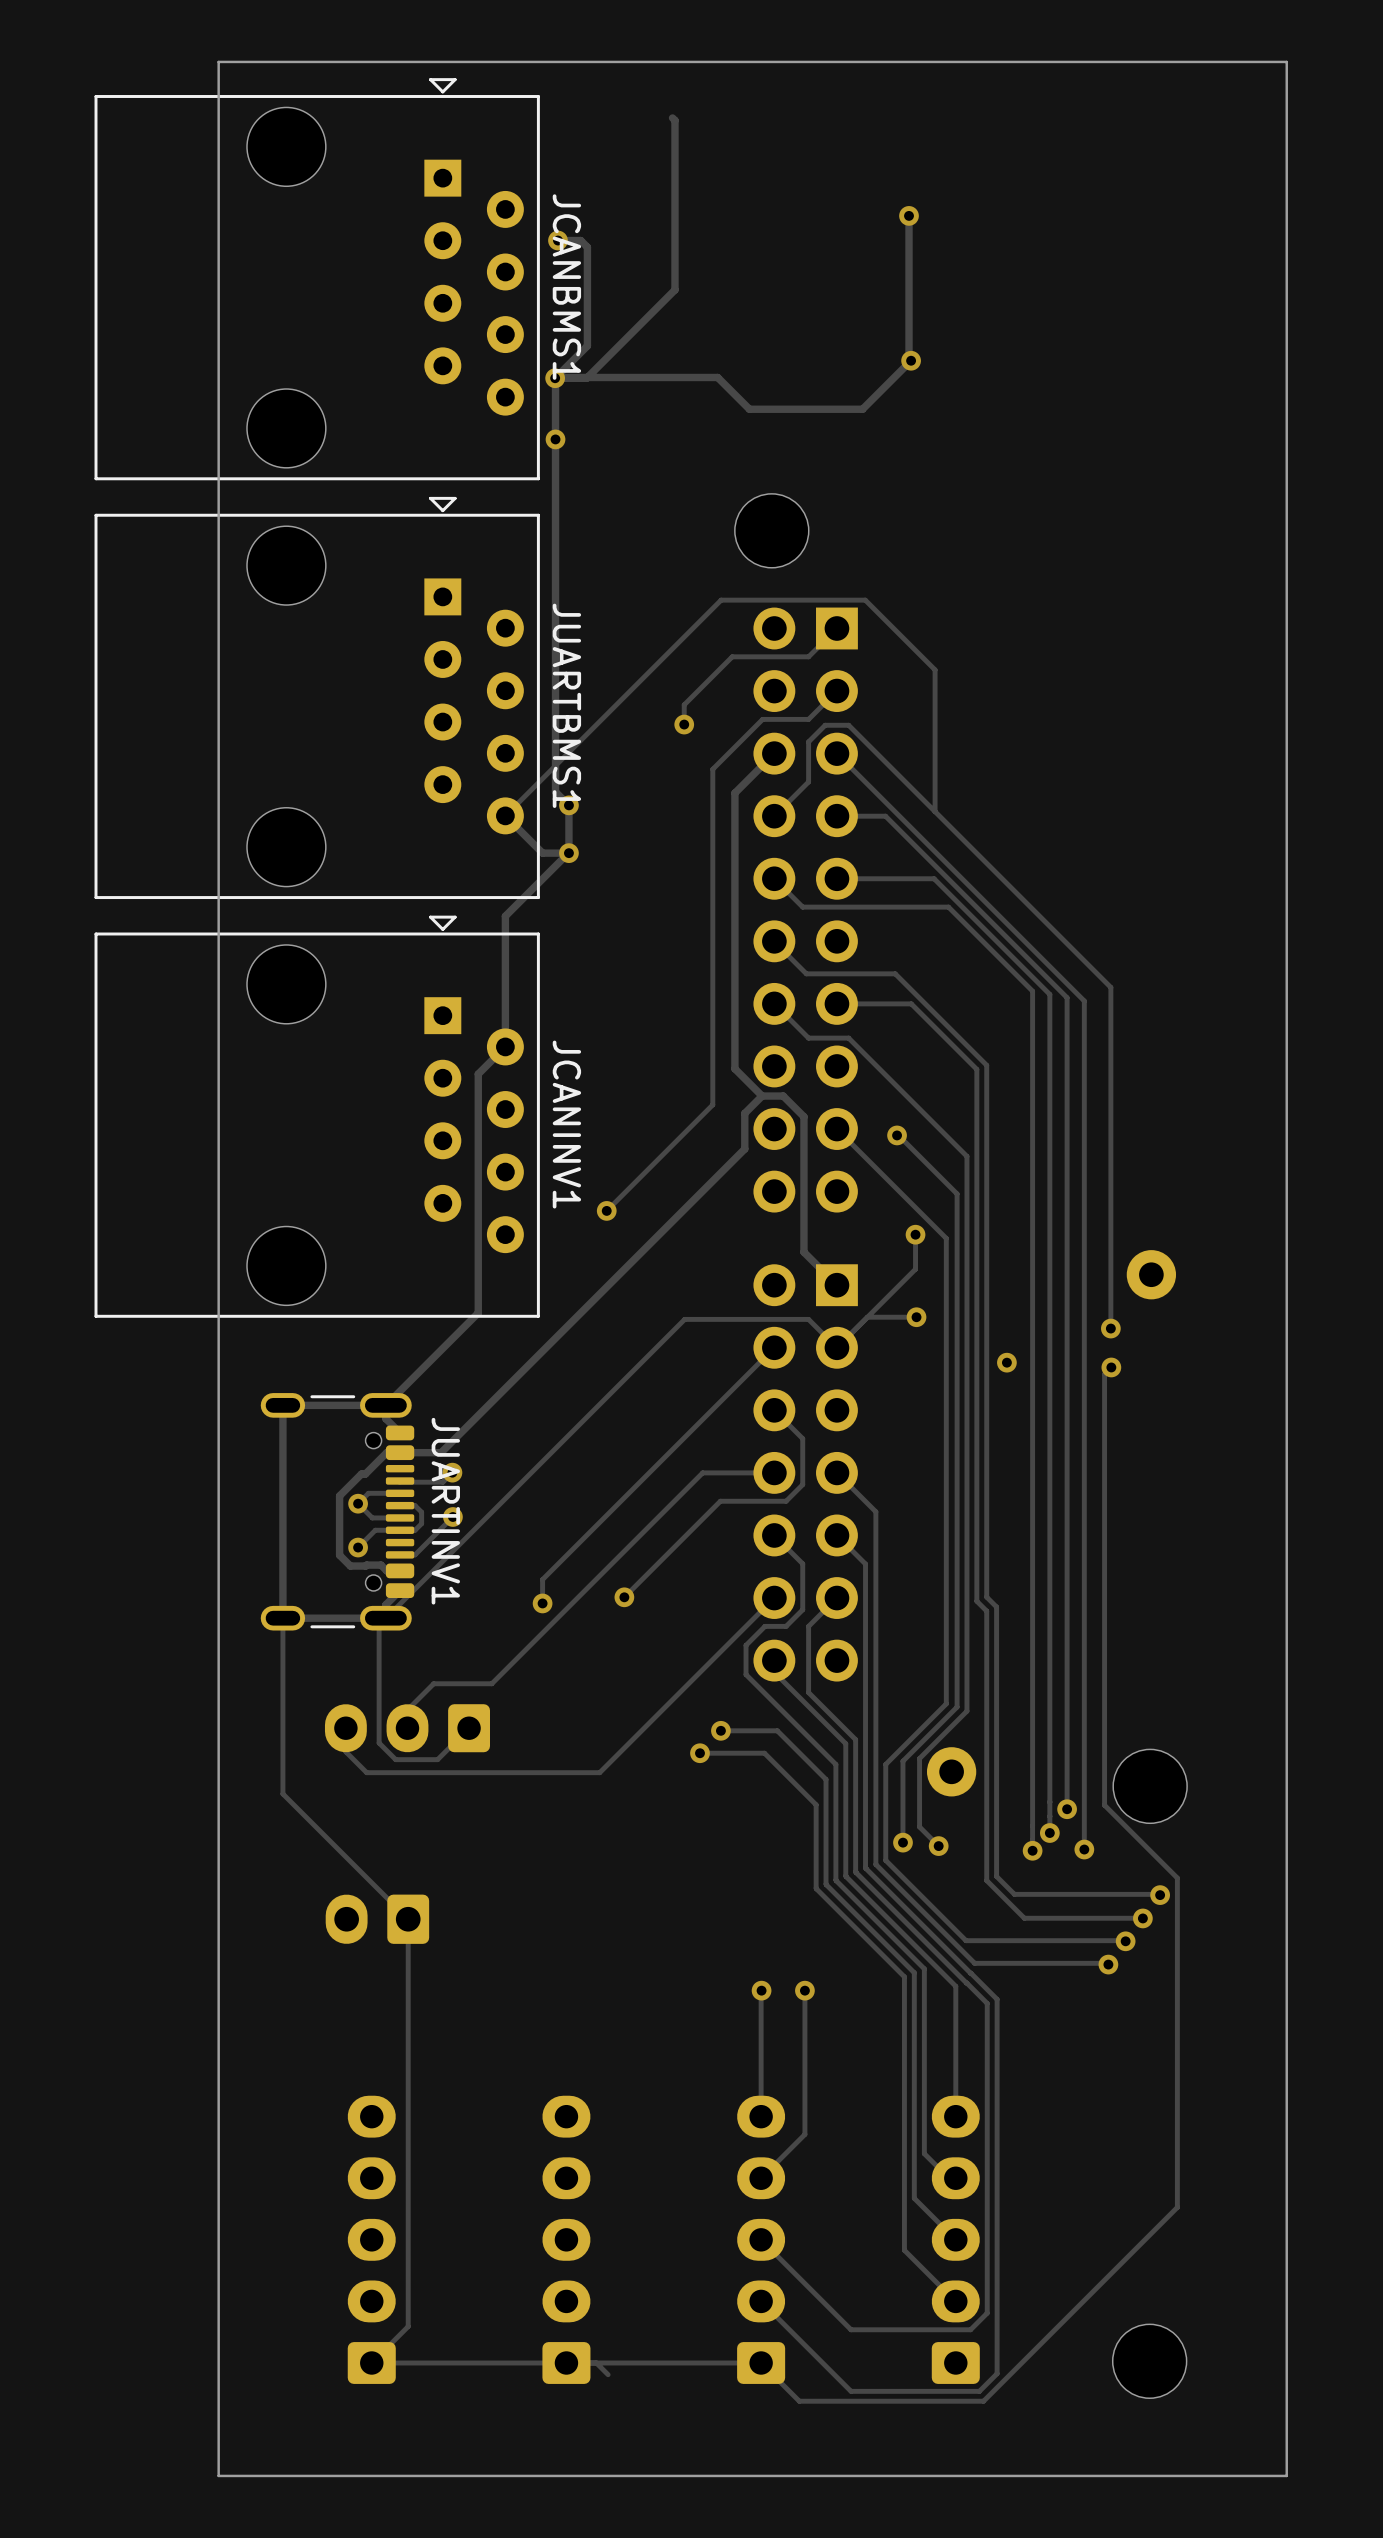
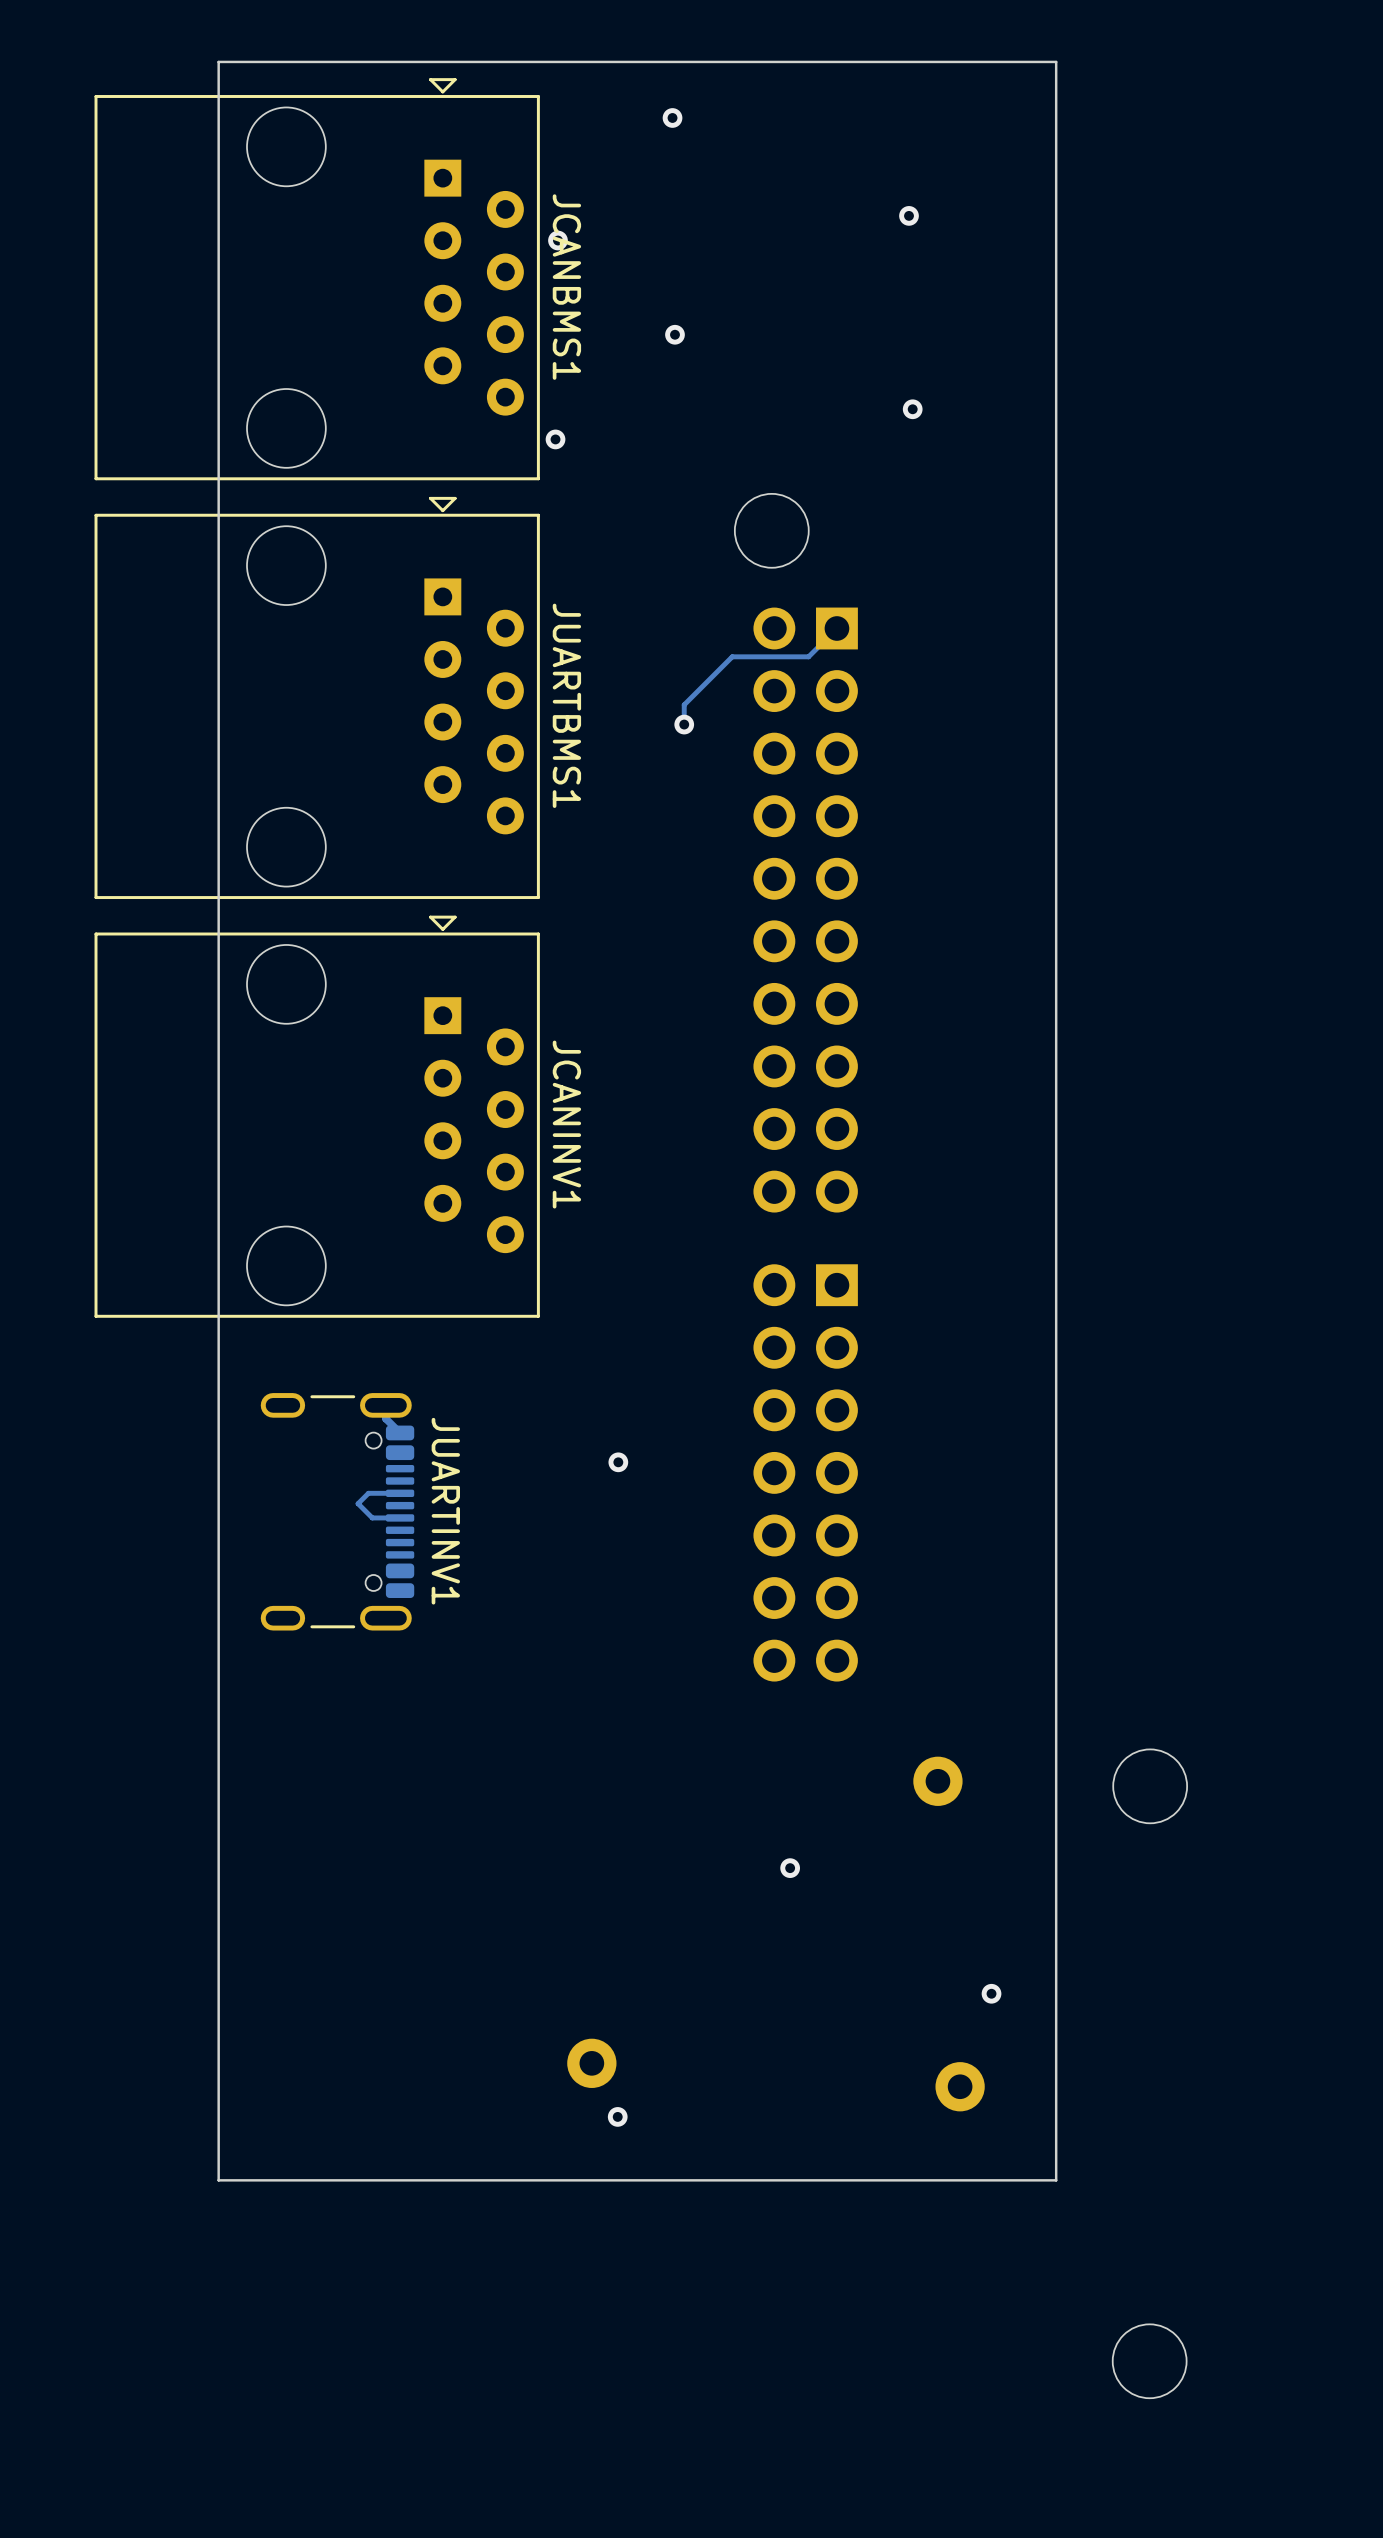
board edge: (1056, 61) (1286, 61) (1286, 2475) (218, 2475) (218, 2180) -> (1056, 61) (1056, 2180) (218, 2180)
track: (672, 117) (674, 120) (674, 289) (586, 378) (555, 378) -> none
via: none -> (672, 117)
track: (909, 215) (909, 358) (911, 360) (862, 409) (749, 409) (717, 377) (555, 377) -> none
track: (557, 240) (580, 240) (587, 247) (587, 345) (555, 378) -> none
via: none -> (674, 334)
via position: (911, 360) -> (912, 409)
track: (555, 378) (555, 378) (555, 791) (568, 805) (568, 853) (542, 853) (505, 815) (721, 600) (865, 600) (935, 669) (935, 811) -> none
via: (555, 378) -> none
track: (836, 691) (808, 719) (762, 719) (712, 769) (712, 1104) (606, 1210) -> none
track: (774, 753) (734, 793) (734, 1068) (762, 1096) -> none
track: (836, 753) (1084, 1001) (1084, 1849) -> none
via: (568, 805) -> none
track: (774, 816) (808, 781) (808, 741) (825, 725) (848, 725) (1110, 987) (1110, 1328) -> none
track: (836, 816) (885, 816) (1067, 997) (1067, 1809) -> none
track: (568, 853) (505, 916) (505, 1046) (478, 1074) (478, 1313) (385, 1405) (282, 1405) (282, 1618) -> none
via: (568, 853) -> none
track: (774, 878) (802, 907) (948, 907) (1032, 991) (1032, 1850) -> none
track: (836, 878) (934, 878) (1049, 994) (1049, 1833) -> none
track: (774, 941) (806, 973) (895, 973) (986, 1065) (986, 1597) (996, 1607) (996, 1876) (1014, 1894) (1160, 1895) -> none
track: (774, 1003) (808, 1038) (848, 1038) (966, 1156) (966, 1711) (919, 1758) (919, 1826) (938, 1846) -> none
track: (836, 1003) (911, 1003) (976, 1069) (976, 1601) (986, 1611) (986, 1880) (1024, 1918) (1142, 1918) -> none
track: (762, 1096) (783, 1096) (803, 1116) (803, 1252) (836, 1285) -> none
track: (762, 1096) (744, 1113) (744, 1149) (441, 1452) (386, 1452) (339, 1495) (339, 1555) (350, 1566) (380, 1565) (386, 1570) (400, 1570) -> none
track: (836, 1129) (946, 1238) (946, 1703) (885, 1764) (885, 1860) (966, 1940) (1125, 1941) -> none
track: (897, 1135) (957, 1193) (957, 1707) (902, 1761) (902, 1843) -> none
via: (897, 1135) -> none
via: (606, 1210) -> none
track: (915, 1234) (915, 1269) (836, 1347) (808, 1319) (684, 1319) (379, 1624) (379, 1743) (395, 1759) (437, 1759) (469, 1728) -> none
via: (915, 1234) -> none
part: (1151, 1274) -> none
track: (916, 1317) (867, 1317) -> none
via: (916, 1317) -> none
via: (1110, 1328) -> none
track: (774, 1347) (542, 1579) (542, 1603) -> none
via: (1006, 1362) -> none
track: (1111, 1367) (1104, 1374) (1104, 1805) (1177, 1878) (1177, 2207) (983, 2401) (799, 2401) (761, 2363) (371, 2363) (408, 2326) (408, 1919) (282, 1793) (282, 1618) -> none
via: (1111, 1367) -> none
track: (774, 1410) (802, 1438) (802, 1484) (786, 1501) (720, 1501) (624, 1597) -> none
via: none -> (618, 1462)
track: (452, 1472) (442, 1482) (399, 1481) -> none
via: (452, 1472) -> none
track: (774, 1472) (702, 1472) (491, 1683) (433, 1683) (407, 1709) (407, 1728) -> none
track: (836, 1472) (875, 1511) (875, 1864) (974, 1963) (1108, 1964) -> none
via: (358, 1503) -> none
track: (400, 1505) (415, 1505) (421, 1512) (421, 1523) (415, 1530) (375, 1530) (358, 1547) -> none
track: (452, 1516) (415, 1554) (400, 1554) -> none
via: (452, 1516) -> none
track: (774, 1535) (802, 1563) (802, 1609) (786, 1626) (765, 1626) (746, 1645) (746, 1674) (835, 1764) (836, 1880) -> none
track: (836, 1535) (865, 1564) (865, 1868) -> none
via: (358, 1547) -> none
track: (400, 1590) (385, 1604) (385, 1618) (282, 1618) -> none
via: (624, 1597) -> none
track: (774, 1598) (599, 1772) (366, 1772) (345, 1751) (345, 1728) -> none
track: (836, 1598) (808, 1626) (808, 1692) (855, 1739) (856, 1872) -> none
via: (542, 1603) -> none
track: (774, 1660) (774, 1672) (845, 1743) (846, 1876) -> none
part: (407, 1728) -> none
track: (720, 1730) (777, 1730) (826, 1779) (826, 1884) -> none
via: (720, 1730) -> none
track: (699, 1753) (764, 1753) (816, 1804) (816, 1888) -> none
via: (699, 1753) -> none
part position: (951, 1771) -> (937, 1781)
via: (1067, 1809) -> none
via: (1049, 1833) -> none
via: (902, 1842) -> none
via: (938, 1846) -> none
via: (1084, 1849) -> none
via: (1032, 1850) -> none
via: none -> (790, 1868)
track: (865, 1868) (970, 1973) -> none
track: (856, 1872) (966, 1983) -> none
track: (846, 1876) (955, 1986) (955, 2116) -> none
track: (836, 1880) (924, 1968) (924, 2153) (948, 2178) (955, 2178) -> none
track: (826, 1884) (914, 1972) (914, 2198) (955, 2239) -> none
track: (816, 1889) (904, 1976) (904, 2250) (955, 2301) -> none
via: (1160, 1895) -> none
via: (1142, 1918) -> none
part: (377, 1919) -> none
via: (1125, 1941) -> none
via: (1108, 1964) -> none
track: (970, 1973) (997, 1999) (997, 2373) (979, 2391) (851, 2391) (761, 2301) -> none
track: (966, 1983) (987, 2003) (987, 2313) (970, 2329) (851, 2329) (761, 2239) -> none
track: (761, 1990) (761, 2116) -> none
via: (761, 1990) -> none
track: (804, 1990) (804, 2134) (761, 2178) -> none
via: (804, 1990) -> none
via: none -> (991, 1993)
part: none -> (591, 2063)
part: none -> (960, 2086)
via: none -> (617, 2116)
part: (371, 2239) -> none
part: (566, 2239) -> none
part: (761, 2239) -> none
part: (955, 2239) -> none
track: (596, 2363) (608, 2374) -> none

